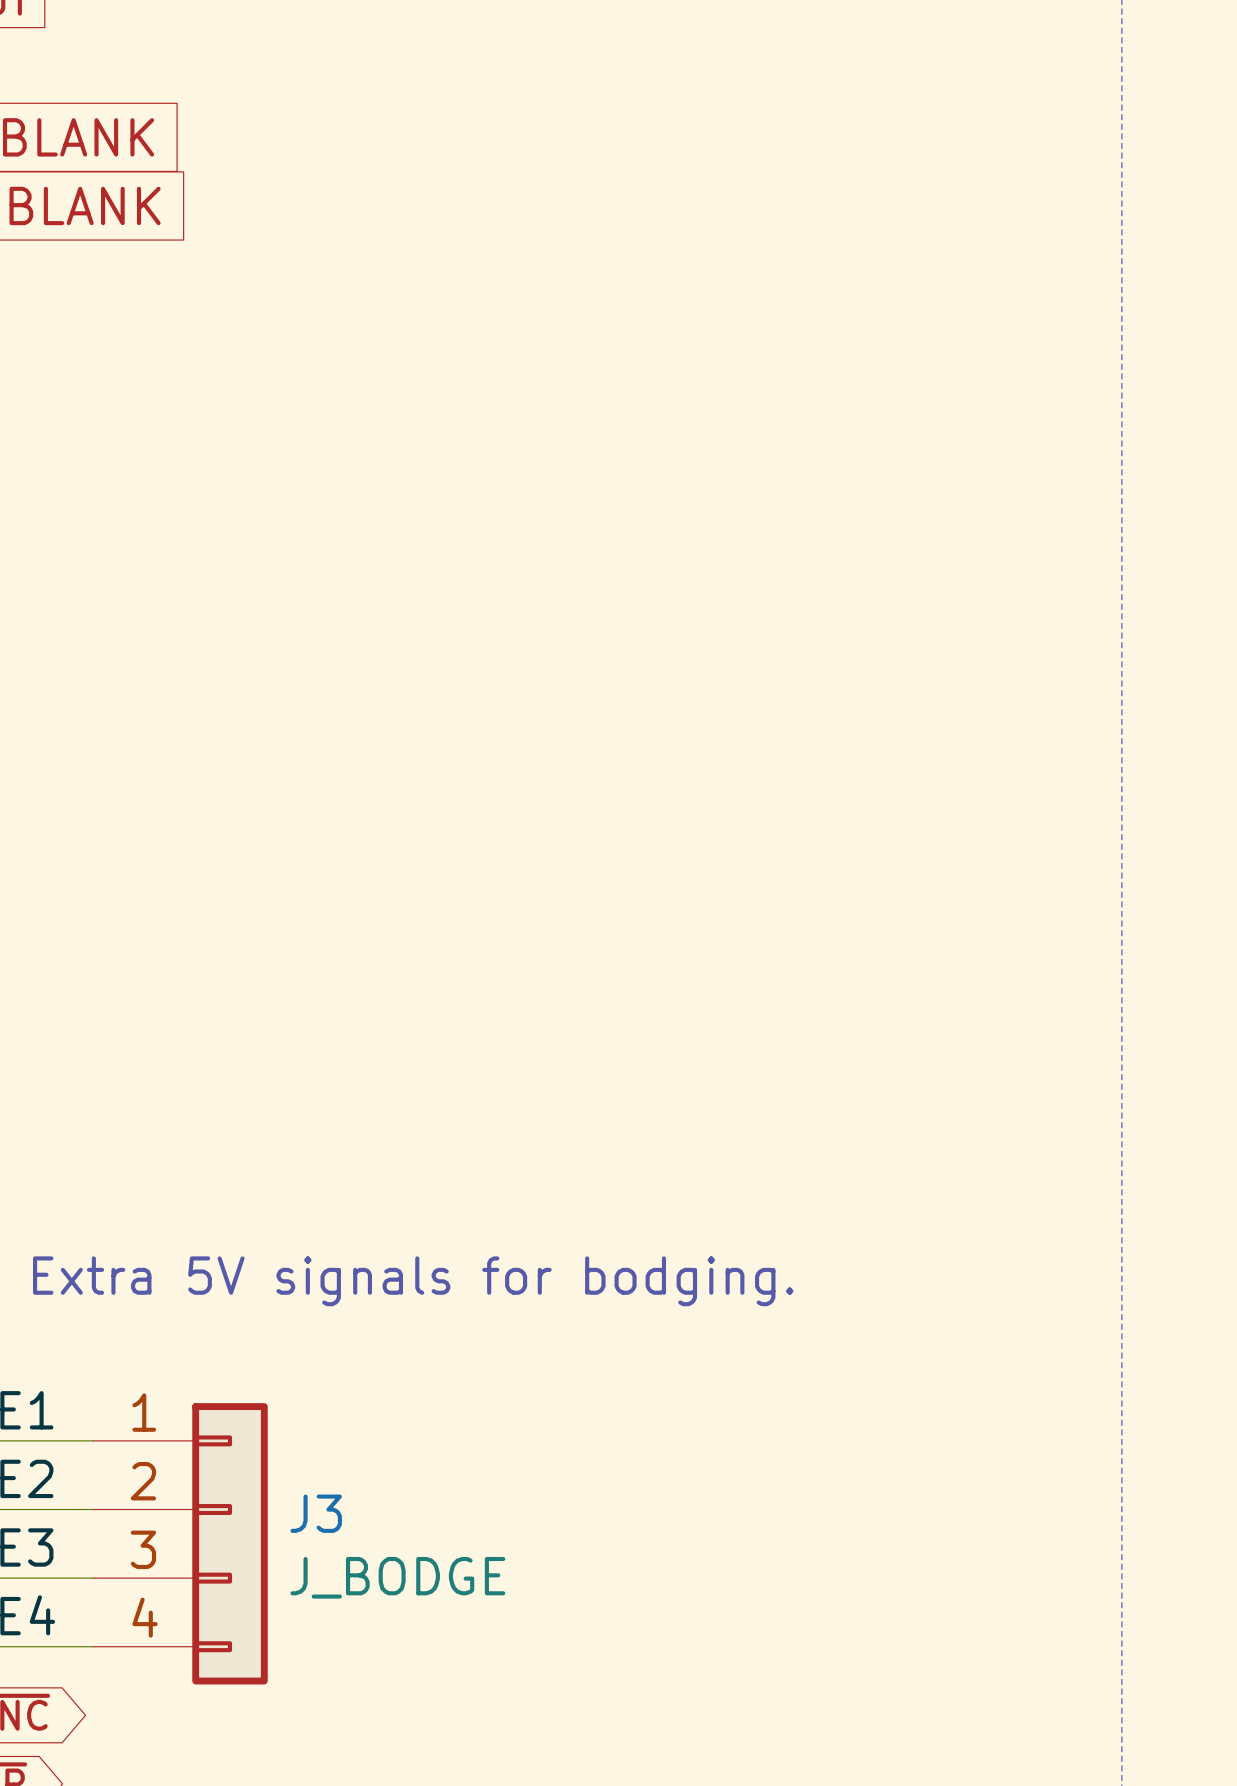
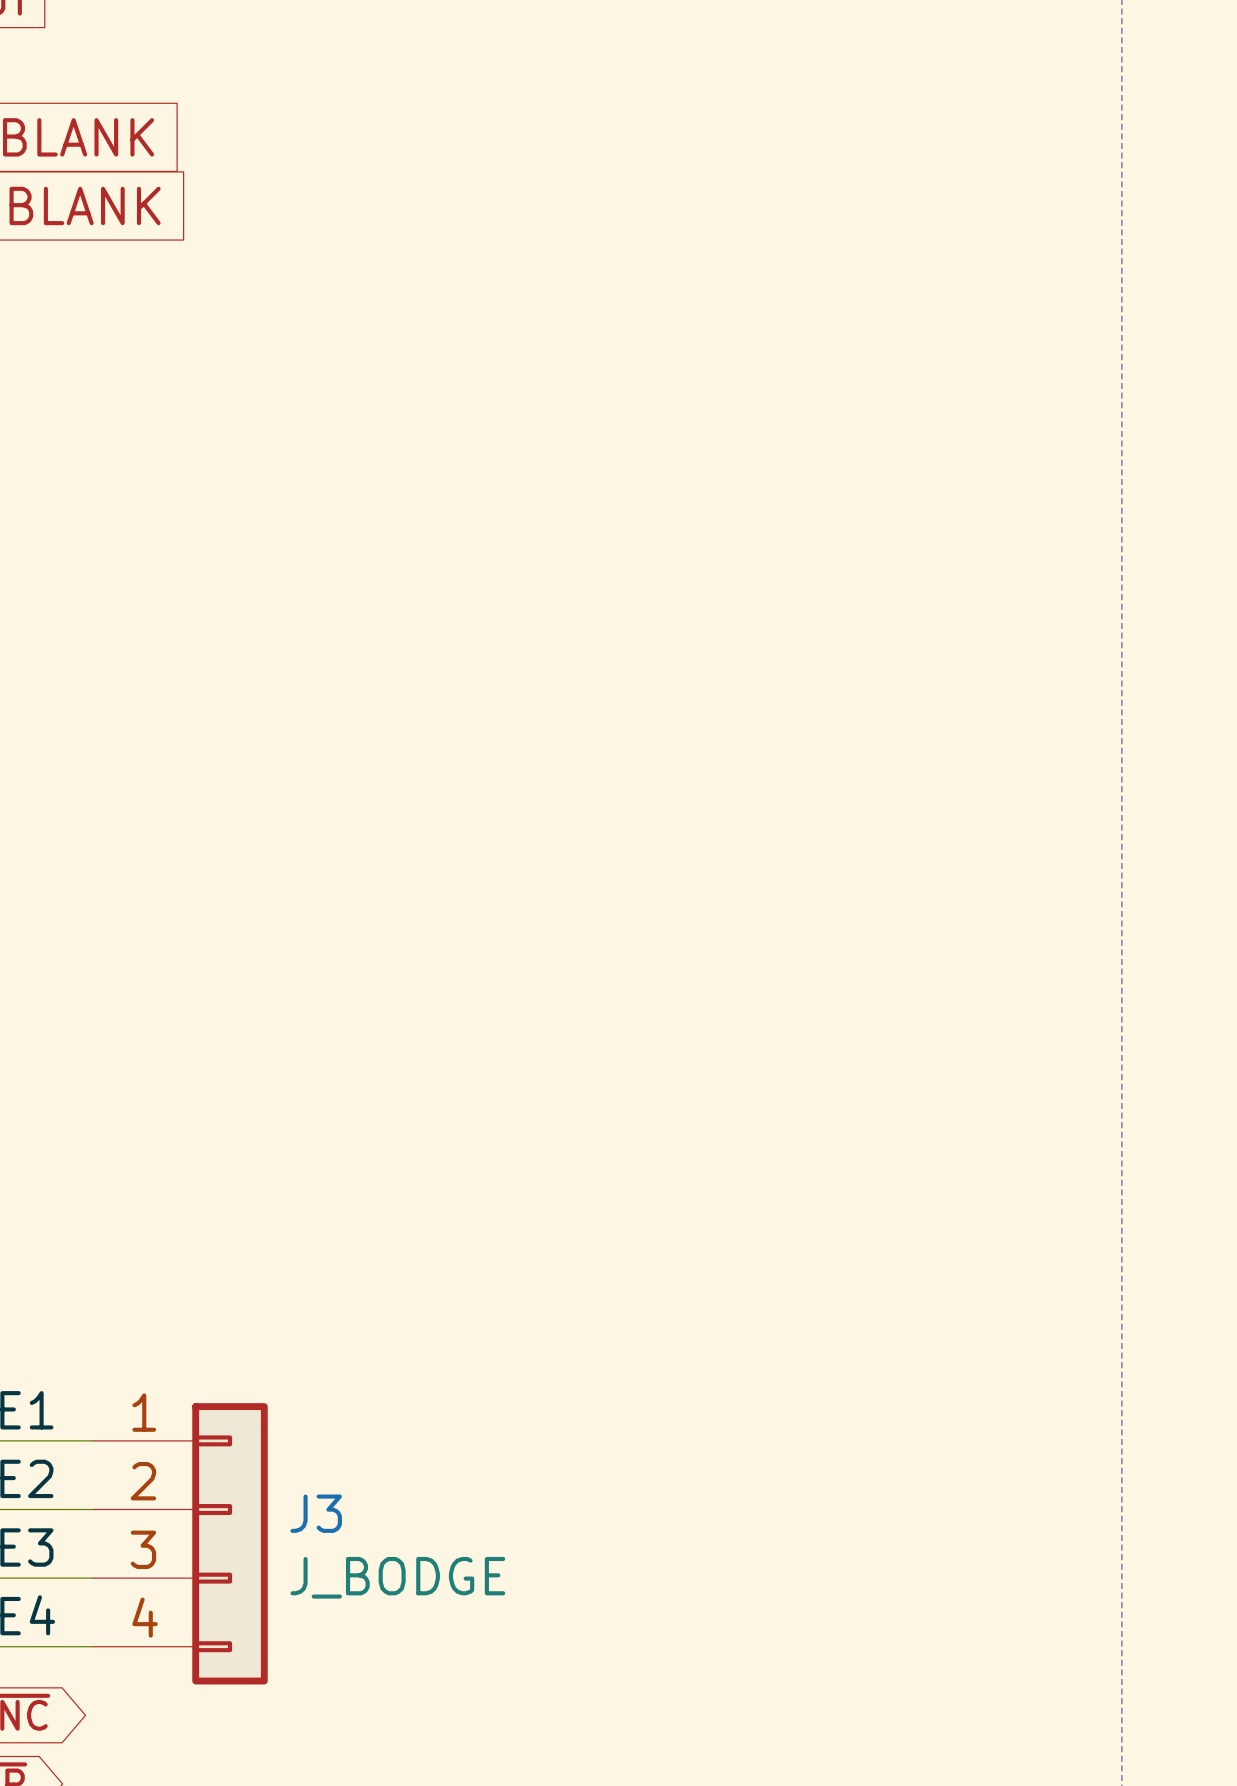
text: Extra 5V signals for bodging. (413, 1281) -> none

